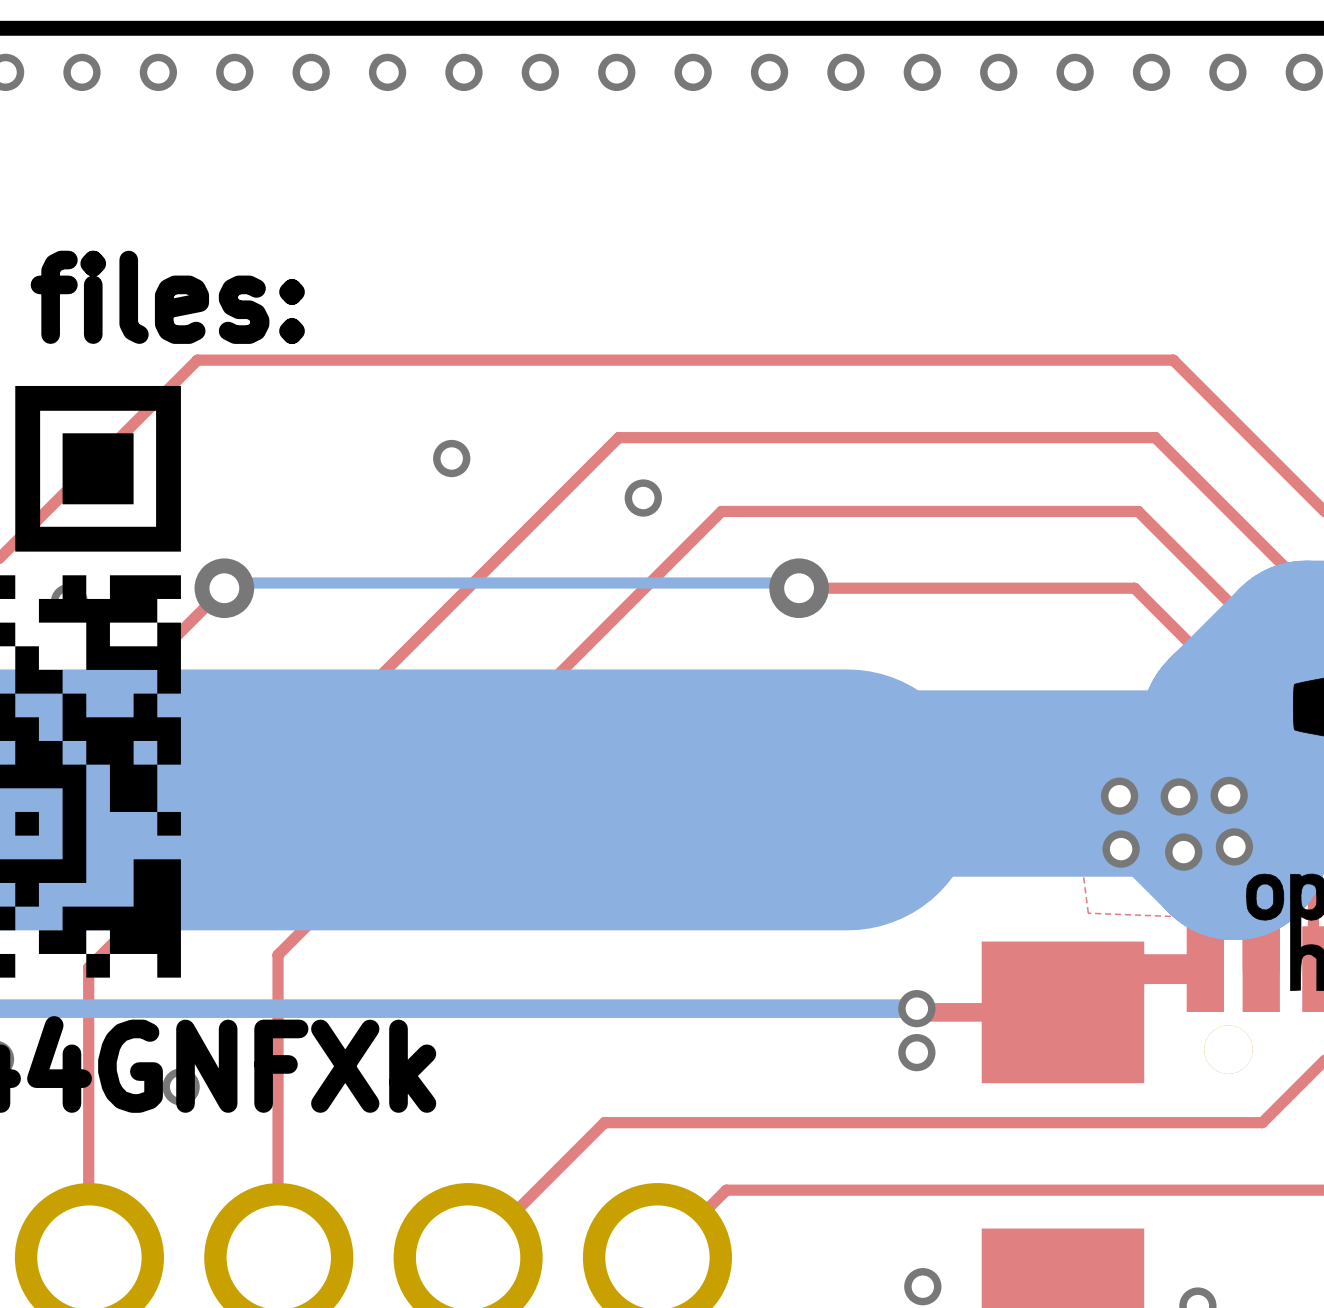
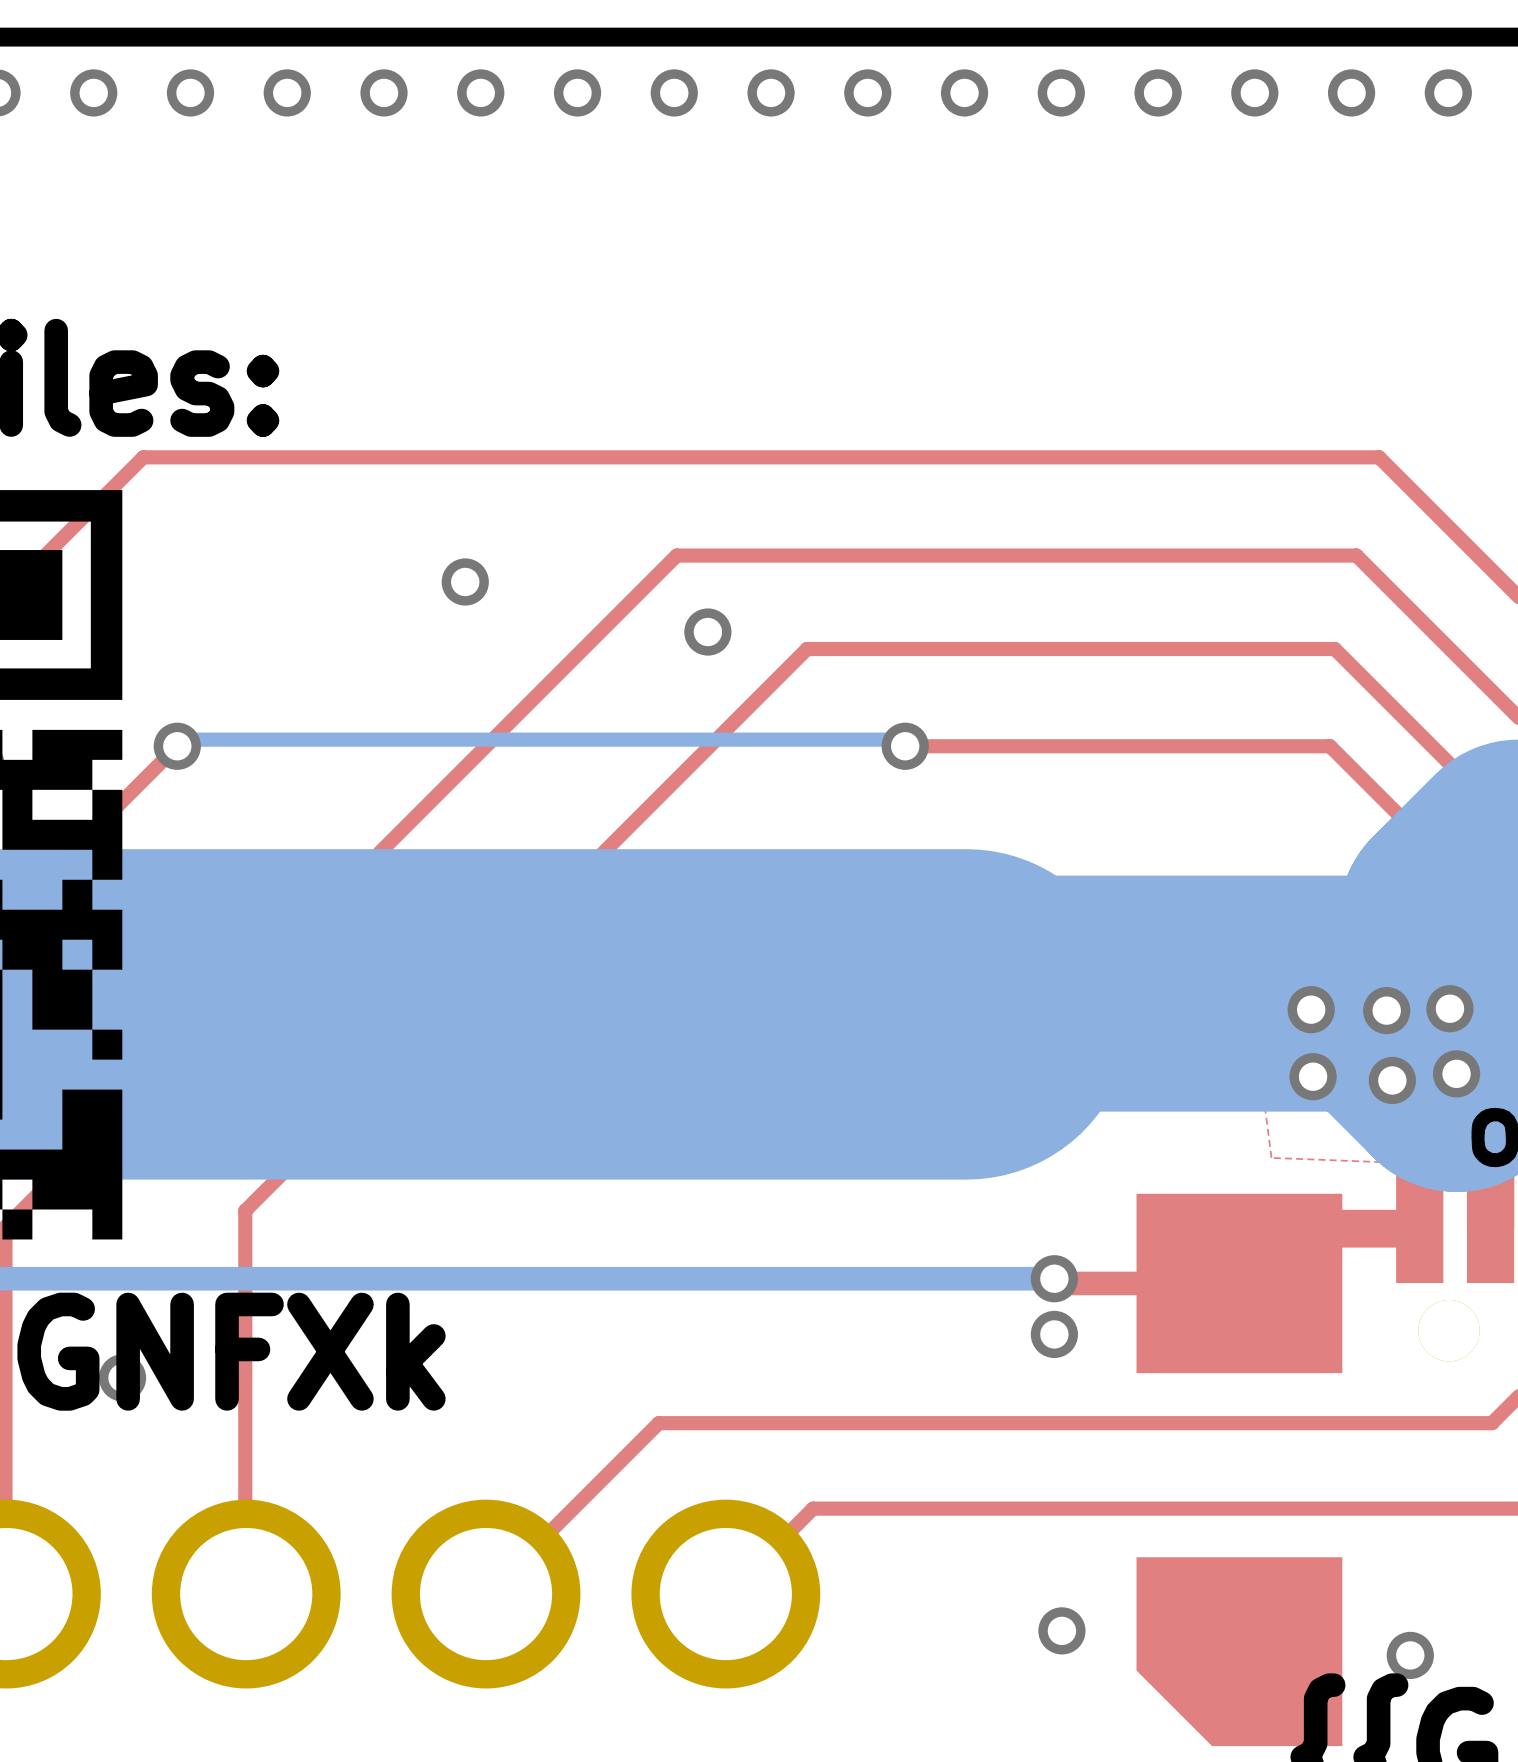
via size: [194, 558, 255, 619] -> [153, 722, 201, 770]
via size: [769, 558, 829, 619] -> [881, 722, 929, 770]

